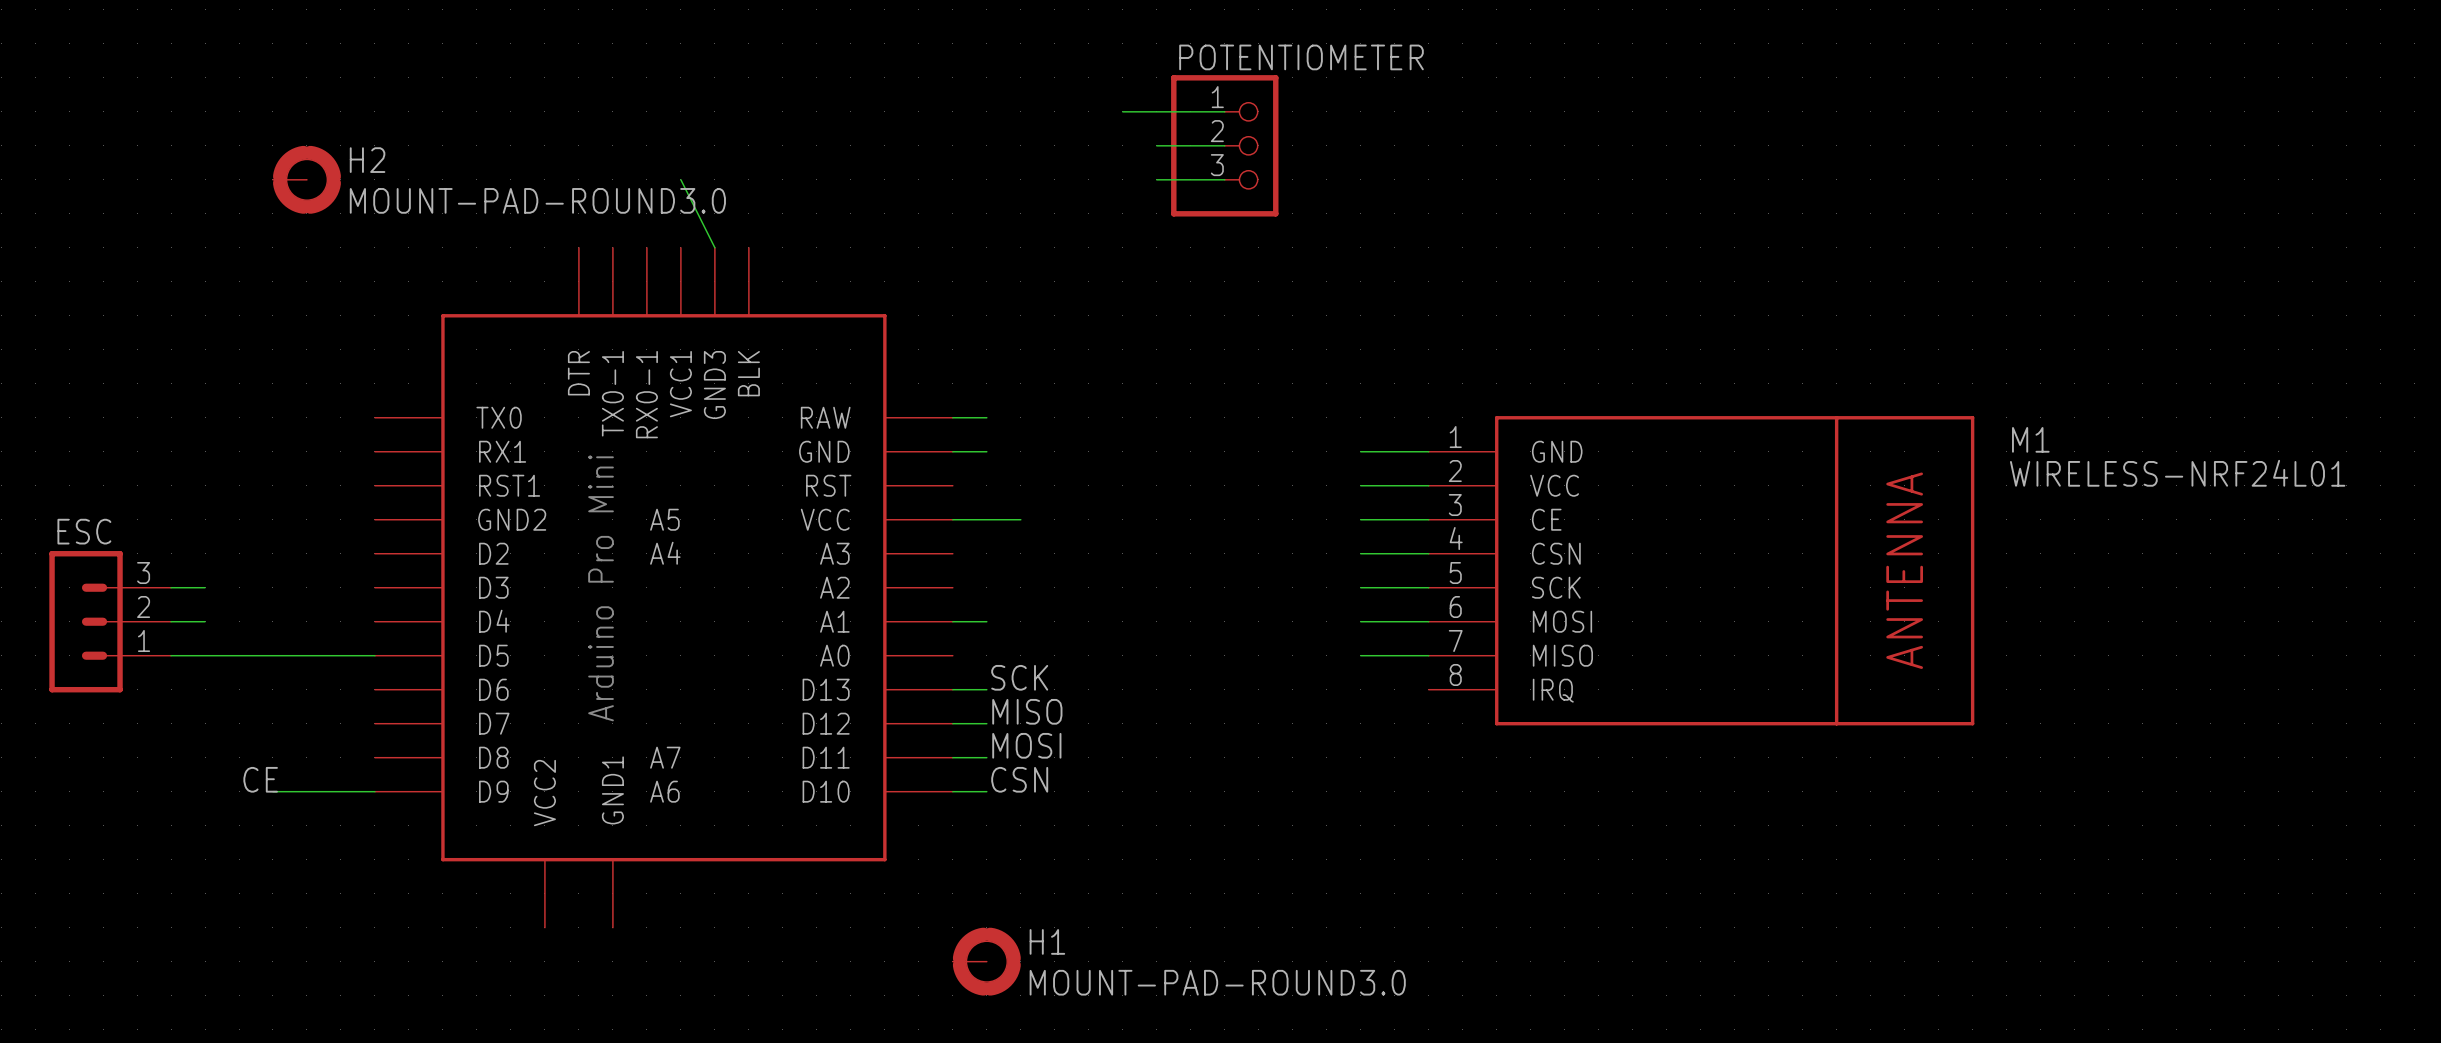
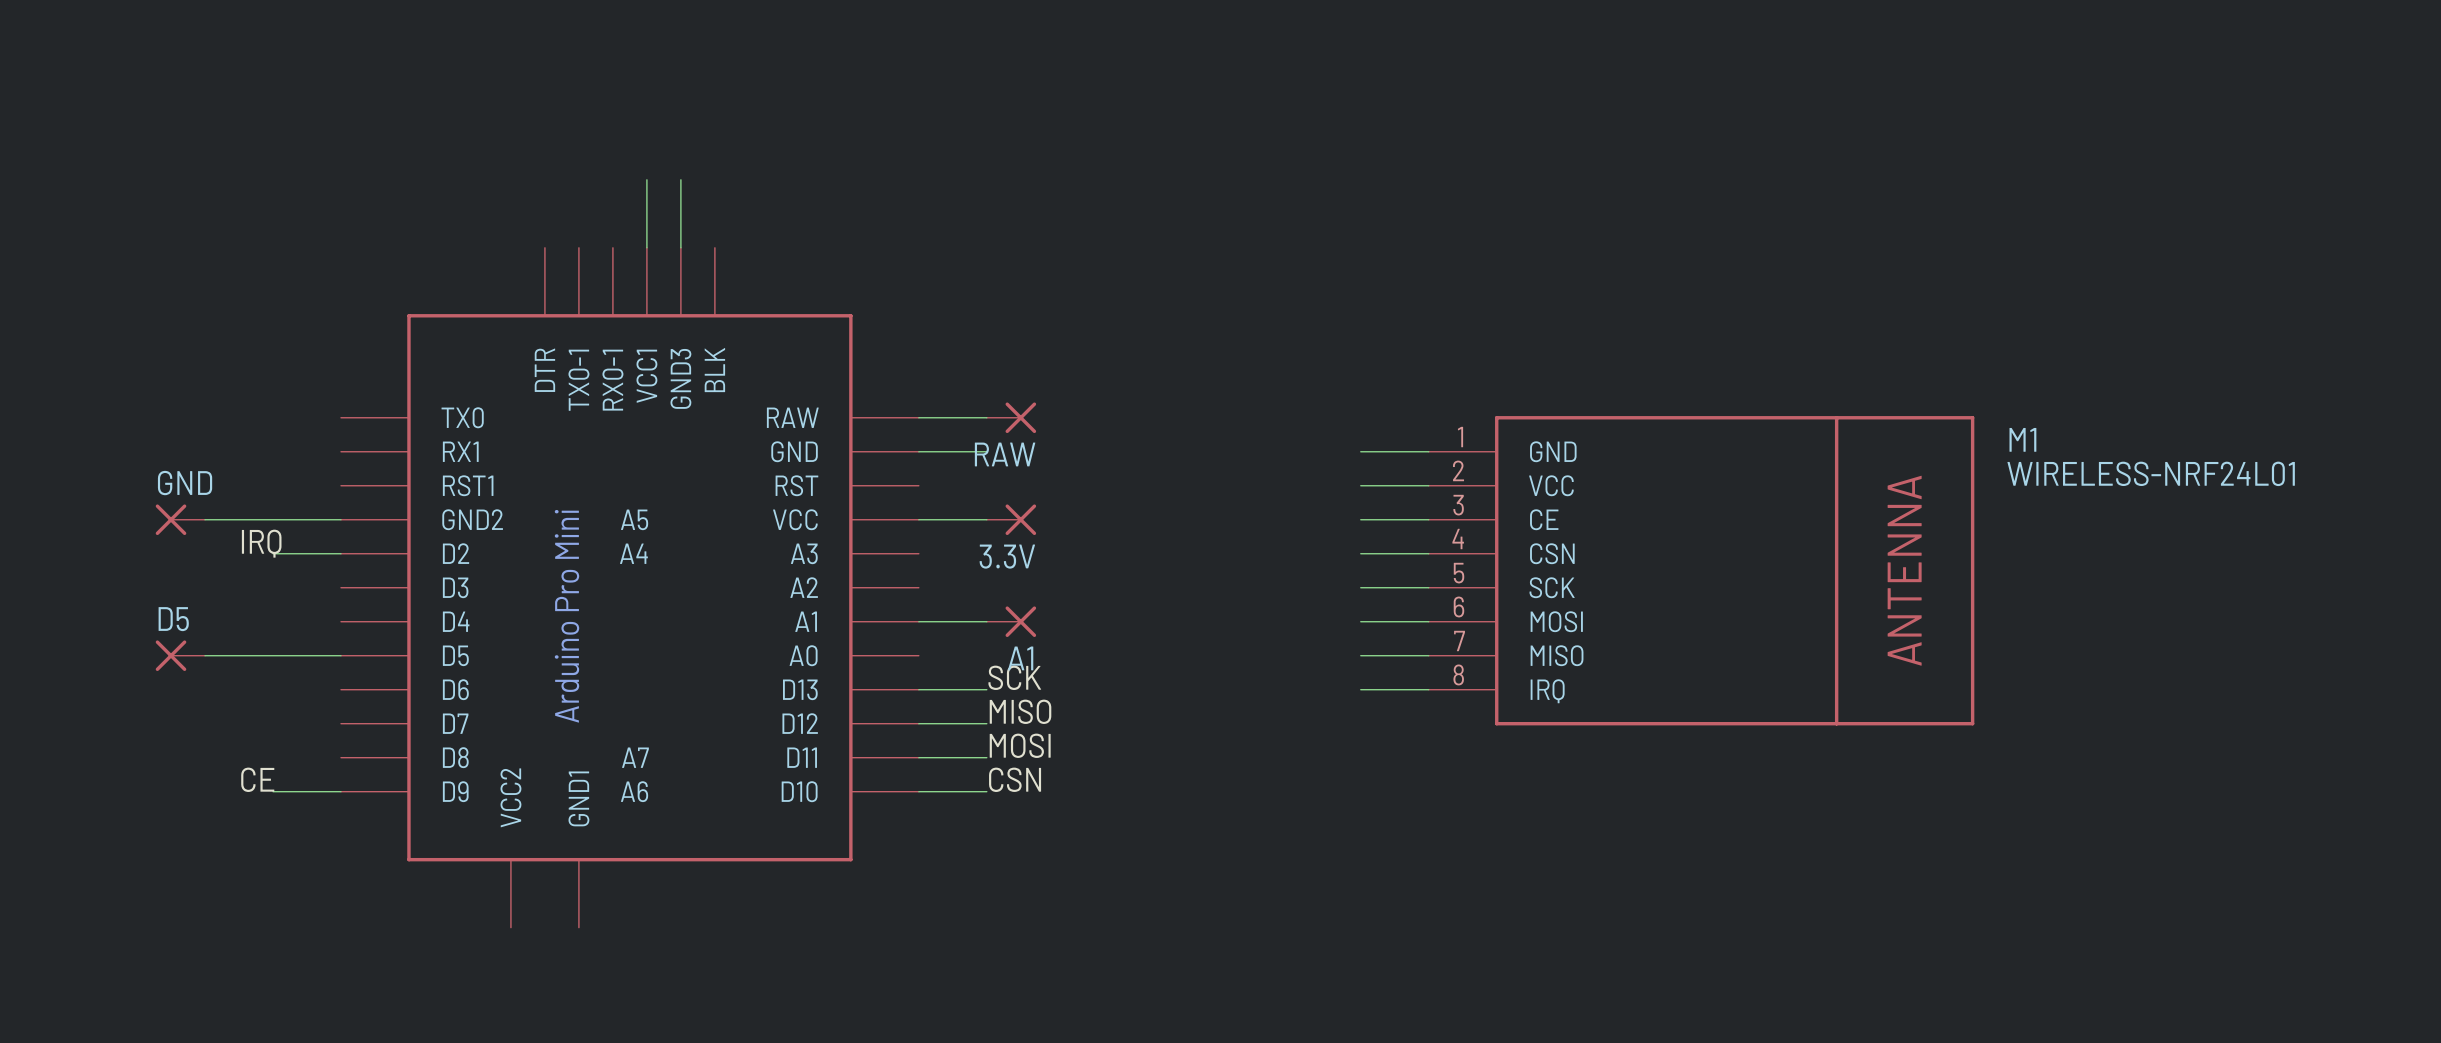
wire: (1122, 111) (1224, 111) -> none
wire: (1156, 145) (1224, 145) -> none
POTENTIOMETER: (1224, 145) -> none
H2: MOUNT-PAD-ROUND3.0 (306, 179) -> none
wire: none -> (646, 179) (646, 247)
wire: (680, 179) (714, 247) -> (680, 179) (680, 247)
wire: (1156, 179) (1224, 179) -> none
RAW: none -> (1011, 417)
GND: none -> (180, 519)
wire: none -> (205, 519) (340, 519)
3.3V: none -> (1011, 519)
label: none -> IRQ (261, 543)
wire: none -> (272, 553) (340, 553)
wire: (171, 587) (205, 587) -> none
part position: (663, 587) -> (629, 587)
ESC: (110, 621) -> none
wire: (171, 621) (205, 621) -> none
A1: none -> (1011, 621)
D5: none -> (180, 655)
wire: none -> (1360, 689) (1428, 689)
H1: MOUNT-PAD-ROUND3.0 (986, 961) -> none

